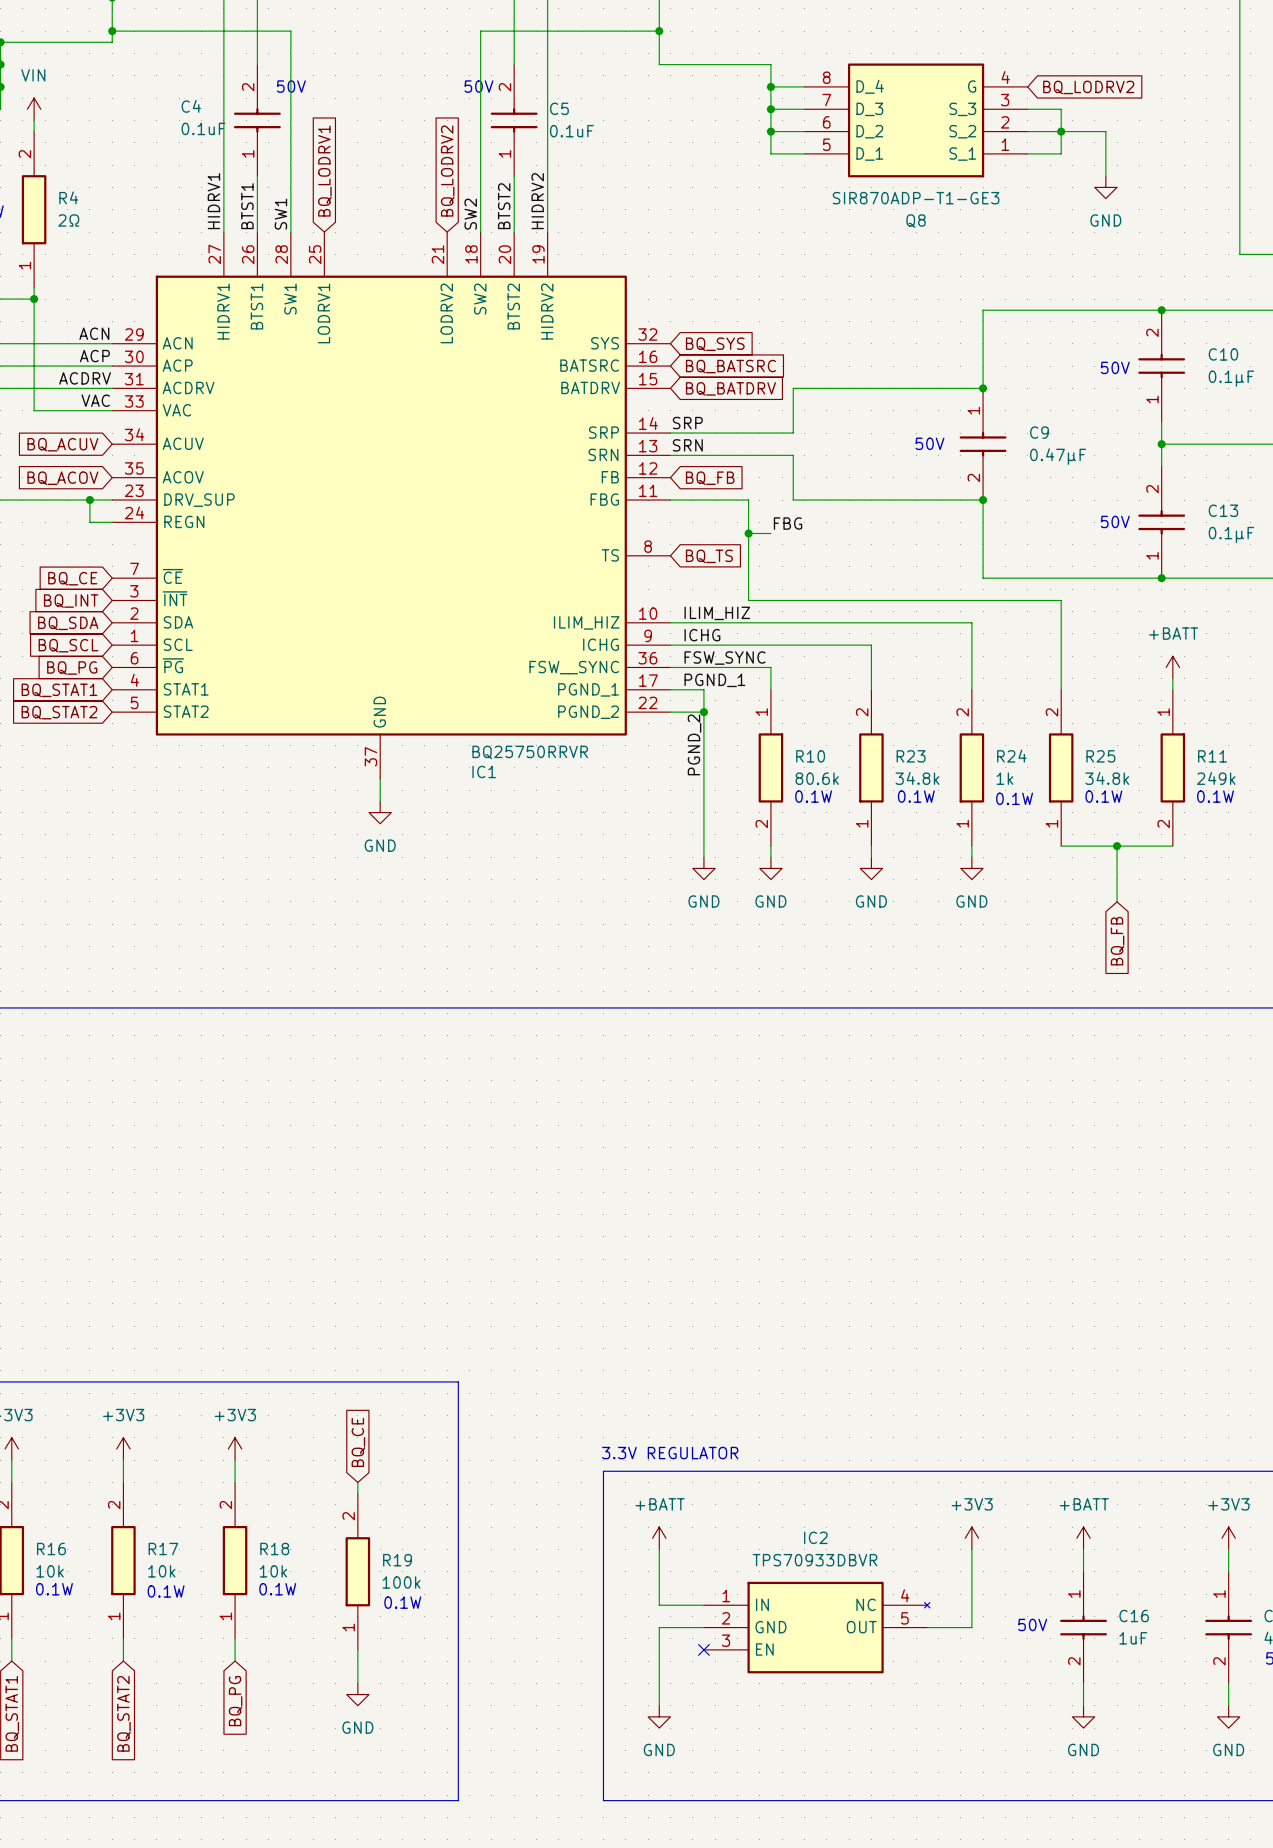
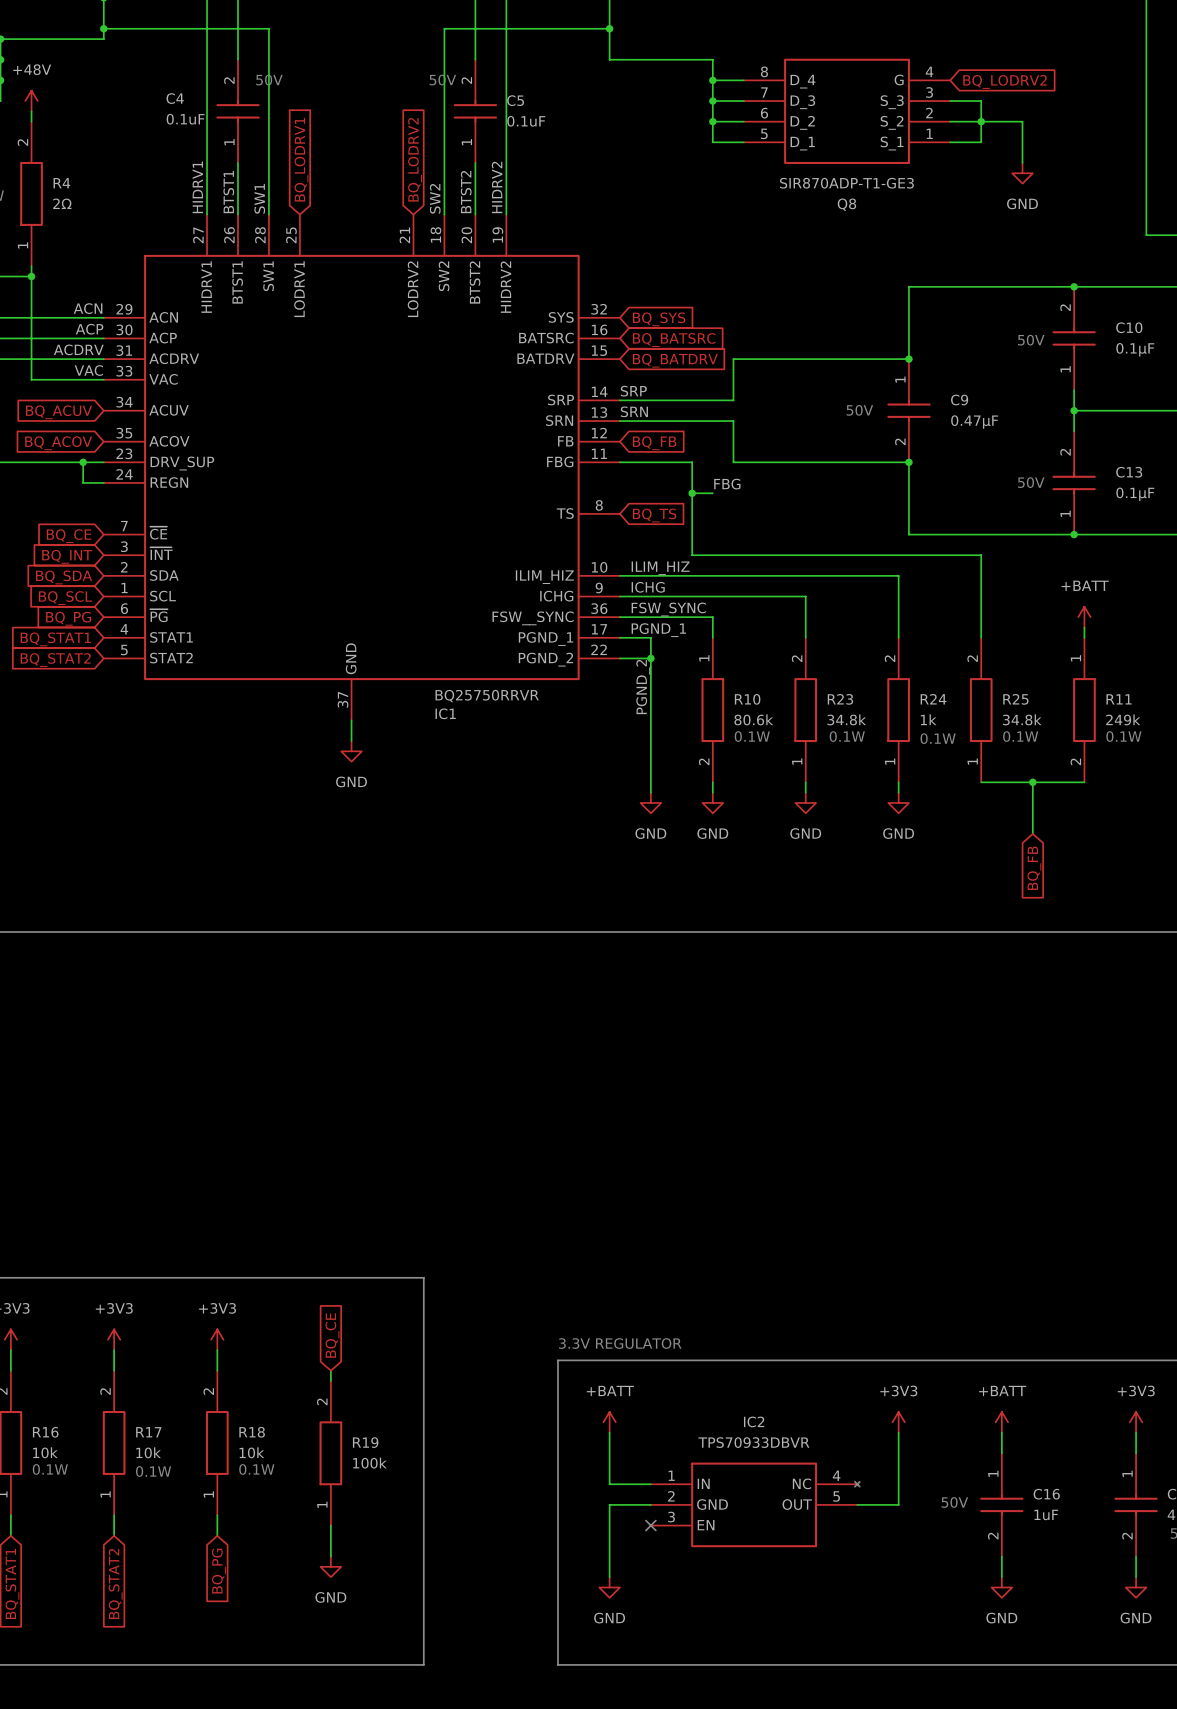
power symbol: VIN (34, 109) -> +48V (31, 101)
text: 0.1W (402, 1602) -> none

